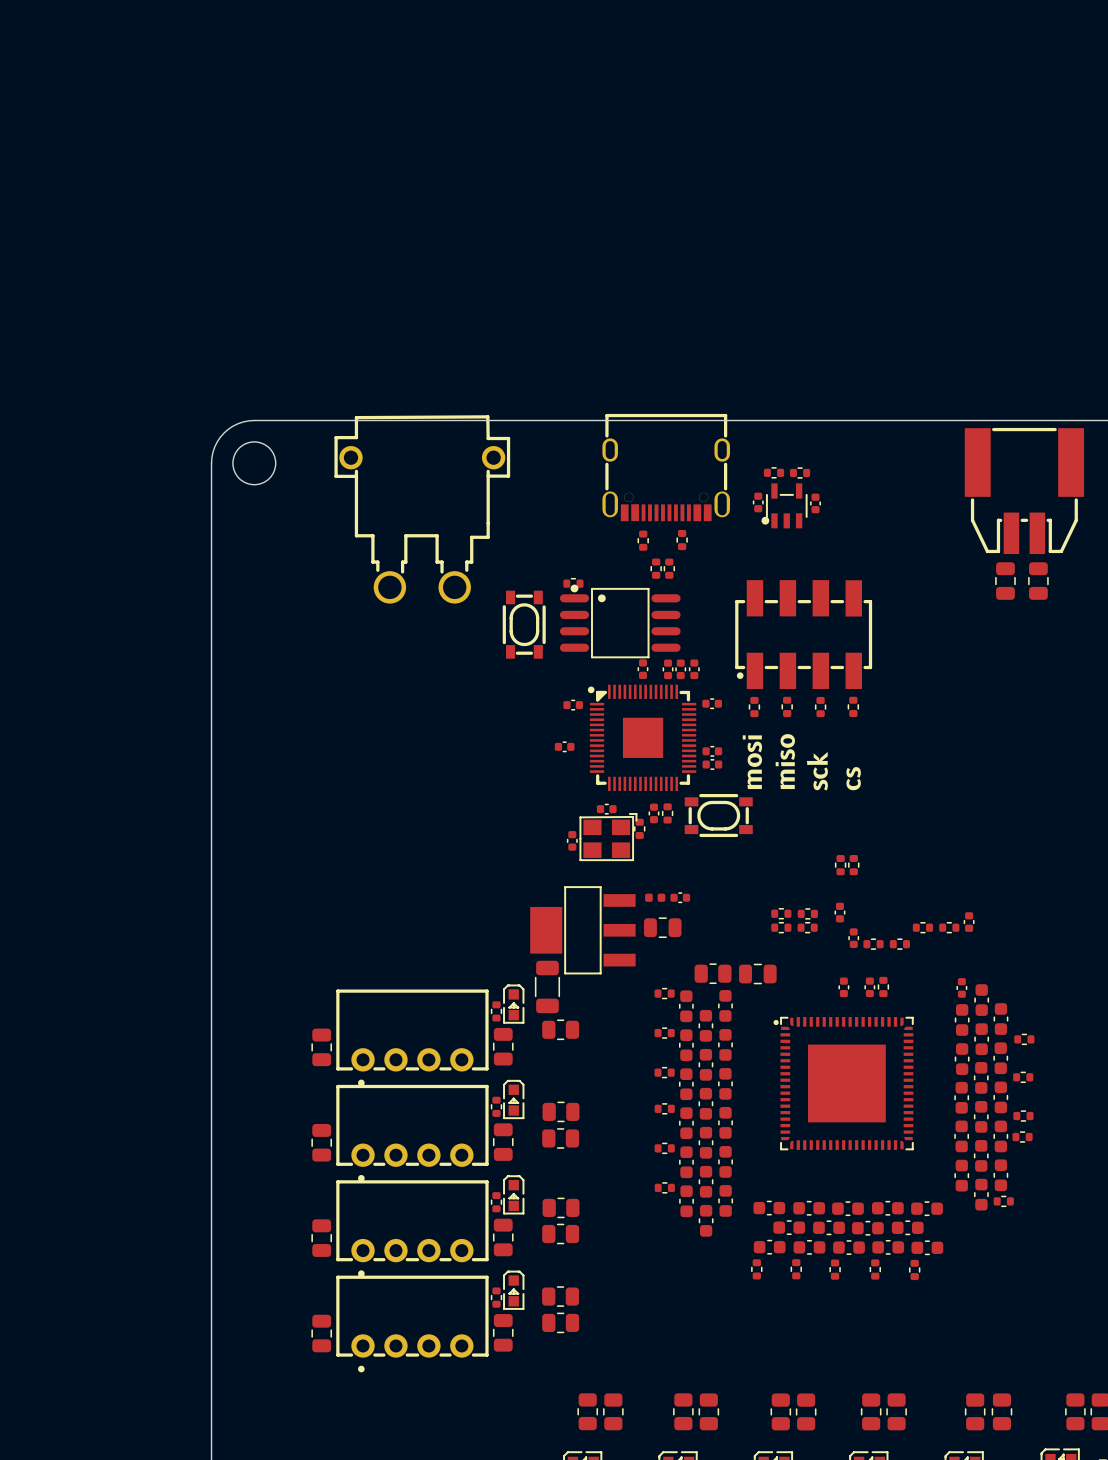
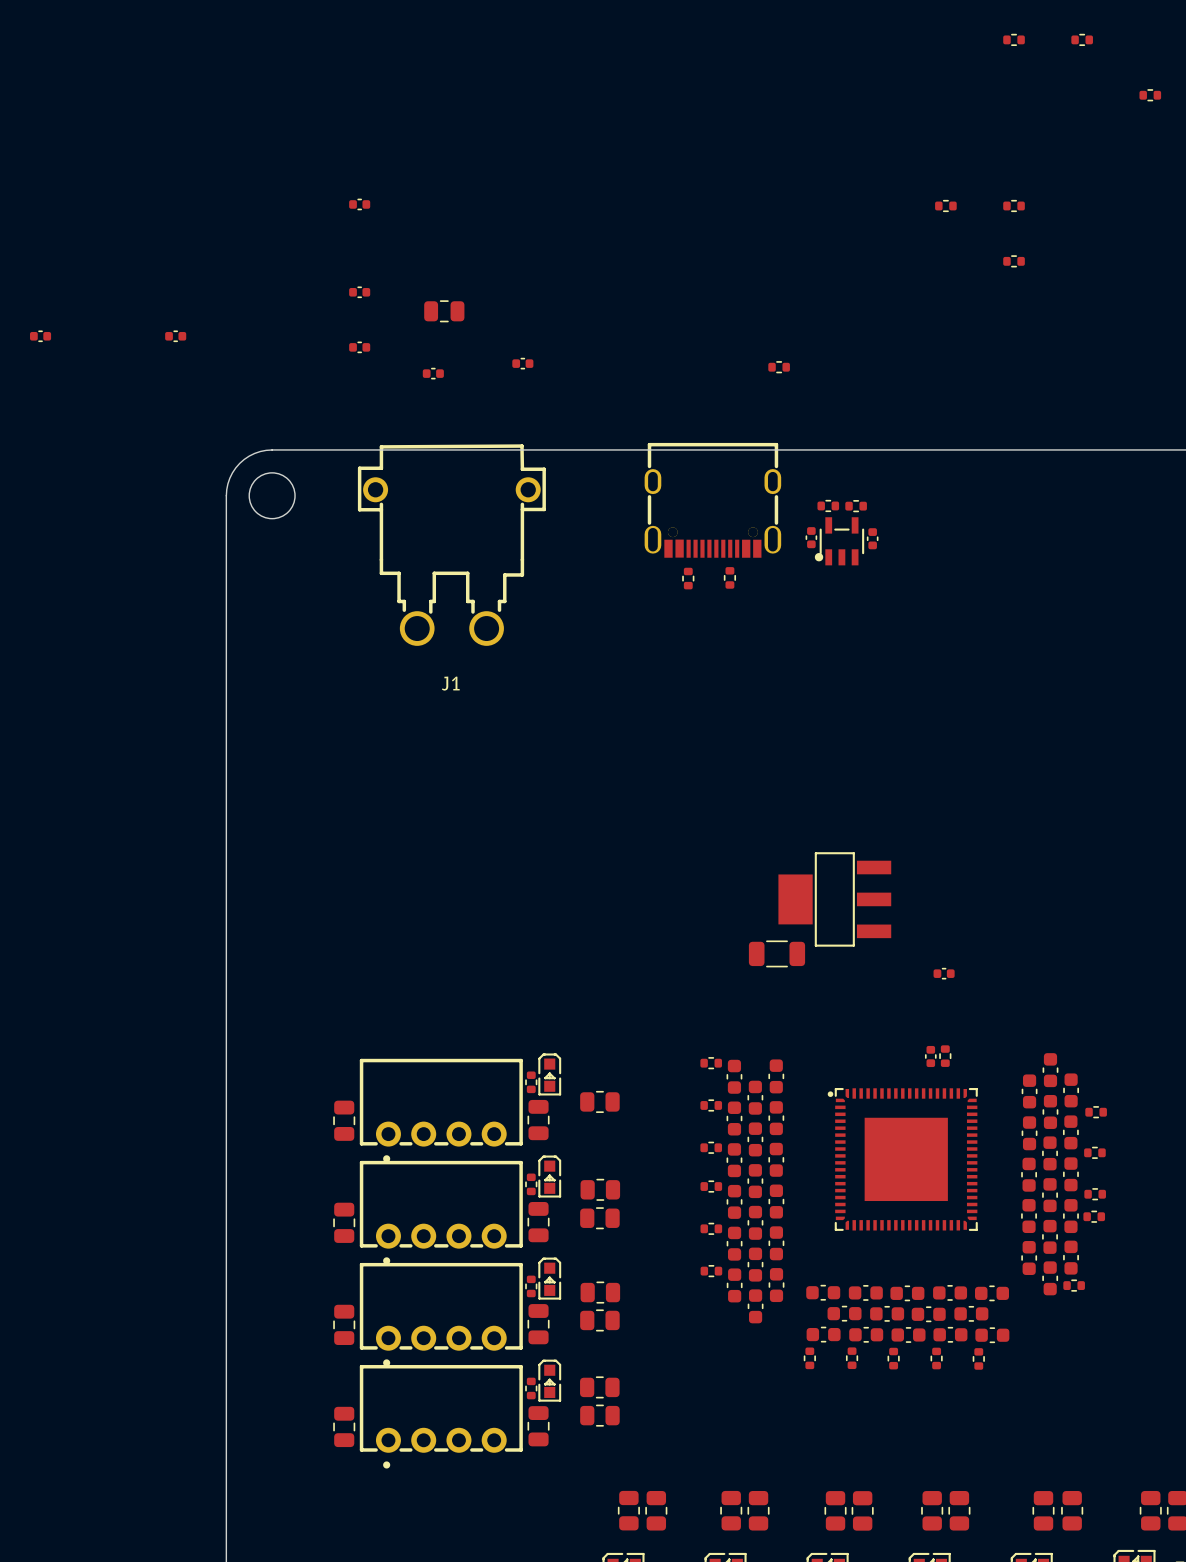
part: none -> (1014, 39)
part: none -> (1082, 39)
part: none -> (1150, 95)
part: none -> (359, 204)
part: none -> (945, 205)
part: none -> (1014, 205)
part: none -> (1014, 261)
part: none -> (359, 292)
part: none -> (444, 311)
part: none -> (40, 336)
part: none -> (175, 336)
part: none -> (359, 347)
part: none -> (522, 363)
part: none -> (779, 367)
part: none -> (433, 373)
part: (1024, 490) -> none
part: (656, 568) -> none
part: (669, 568) -> none
part: (1005, 581) -> none
part: (1038, 581) -> none
part: (573, 583) -> none
part: (620, 621) -> none
part: (524, 624) -> none
part: (803, 634) -> none
J1 name: none -> J1 (450, 683)
part: (642, 669) -> none
part: (668, 669) -> none
part: (680, 669) -> none
part: (694, 669) -> none
part: (712, 703) -> none
part: (573, 705) -> none
part: (787, 706) -> none
part: (853, 706) -> none
part: (754, 707) -> none
part: (820, 707) -> none
part: (642, 737) -> none
part: (564, 746) -> none
part: (712, 751) -> none
text: miso (785, 761) -> none
text: mosi (752, 762) -> none
part: (712, 764) -> none
text: sck (817, 771) -> none
text: cs (853, 778) -> none
part: (606, 809) -> none
part: (653, 813) -> none
part: (667, 813) -> none
part: (718, 815) -> none
part: (639, 828) -> none
part: (608, 837) -> none
part: (572, 840) -> none
part: (840, 865) -> none
part: (853, 865) -> none
part: (655, 897) -> none
part: (680, 897) -> none
part: none -> (944, 973)
part: (839, 912) -> none
part: (781, 913) -> none
part: (807, 913) -> none
part: (969, 922) -> none
part: (662, 927) -> none
part: (781, 927) -> none
part: (807, 927) -> none
part: (922, 927) -> none
part: (949, 927) -> none
part position: (582, 930) -> (834, 899)
part: (853, 938) -> none
part: (873, 944) -> none
part: (899, 944) -> none
part: (713, 973) -> none
part: (757, 974) -> none
part rotation: 0° (547, 986) -> 90° clockwise (777, 953)
part position: (547, 986) -> (777, 953)
part: (843, 987) -> none
part: (961, 987) -> none

